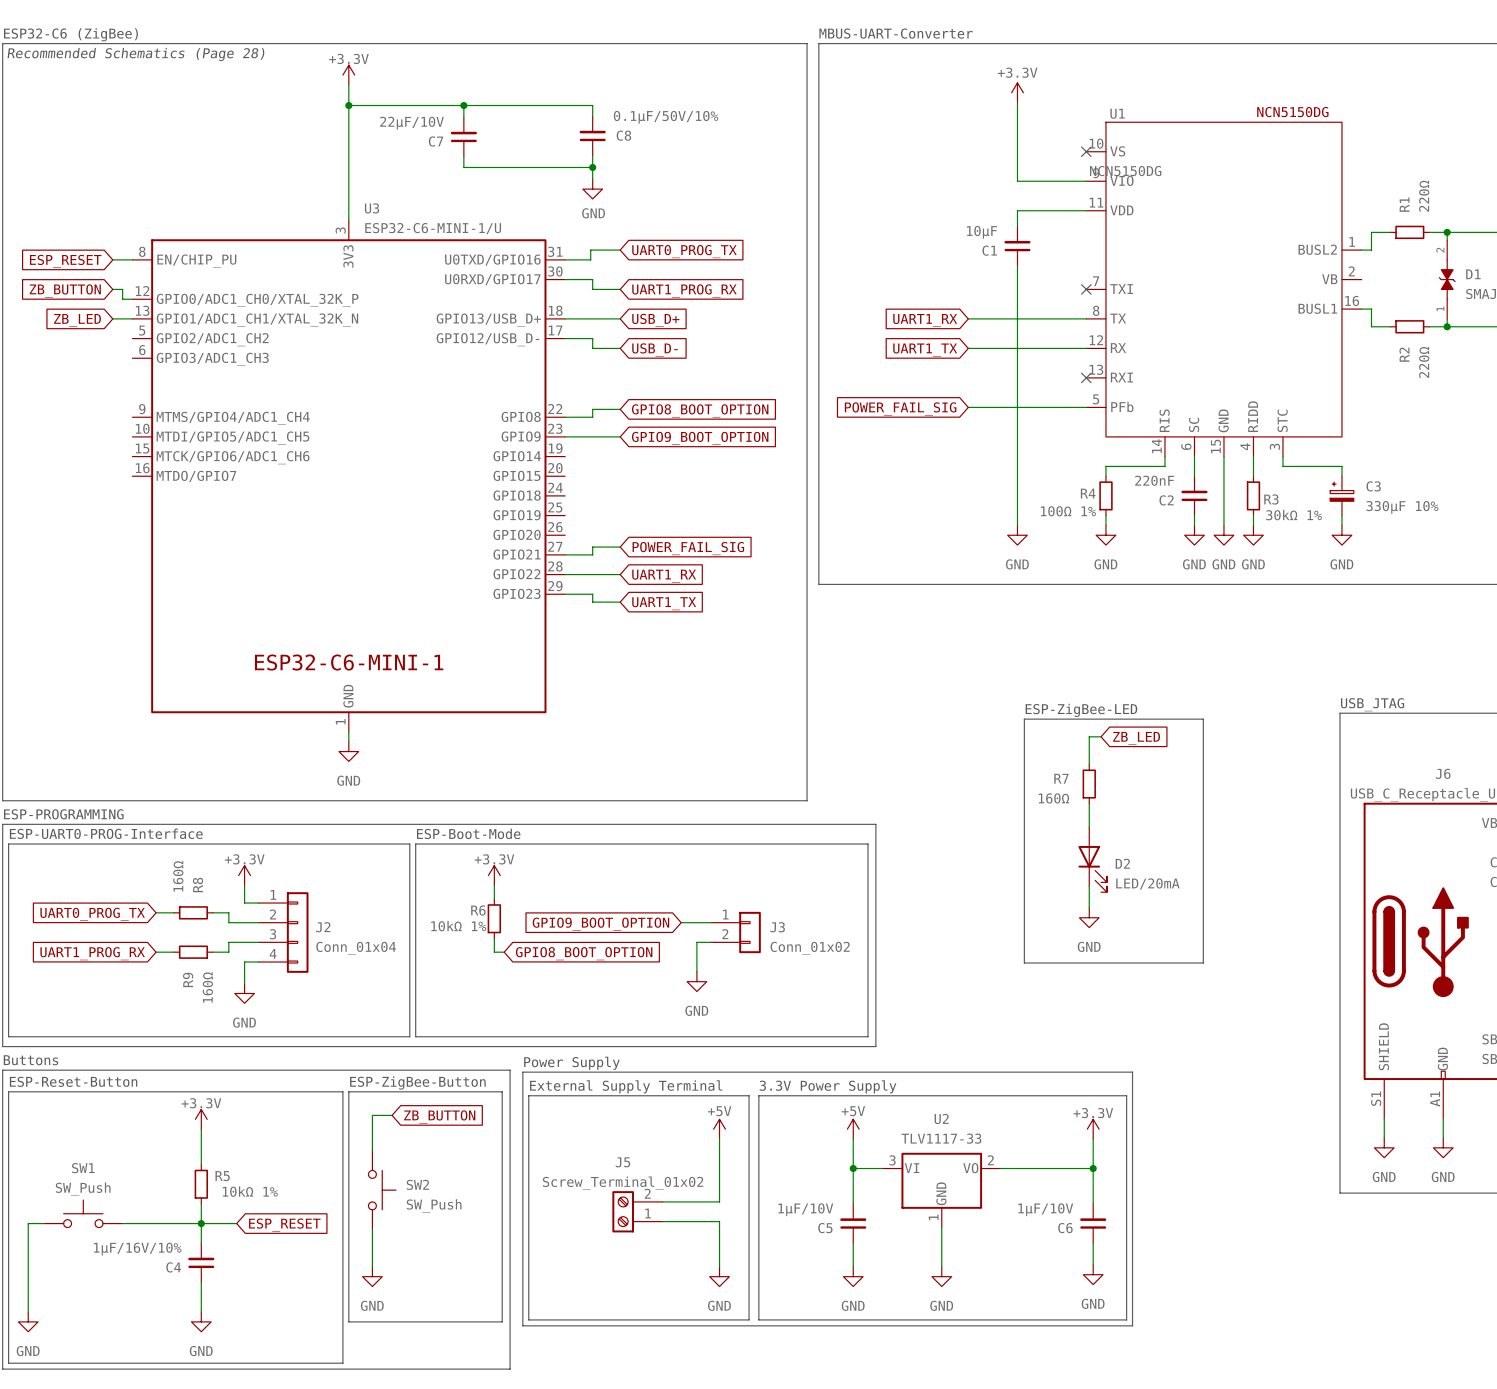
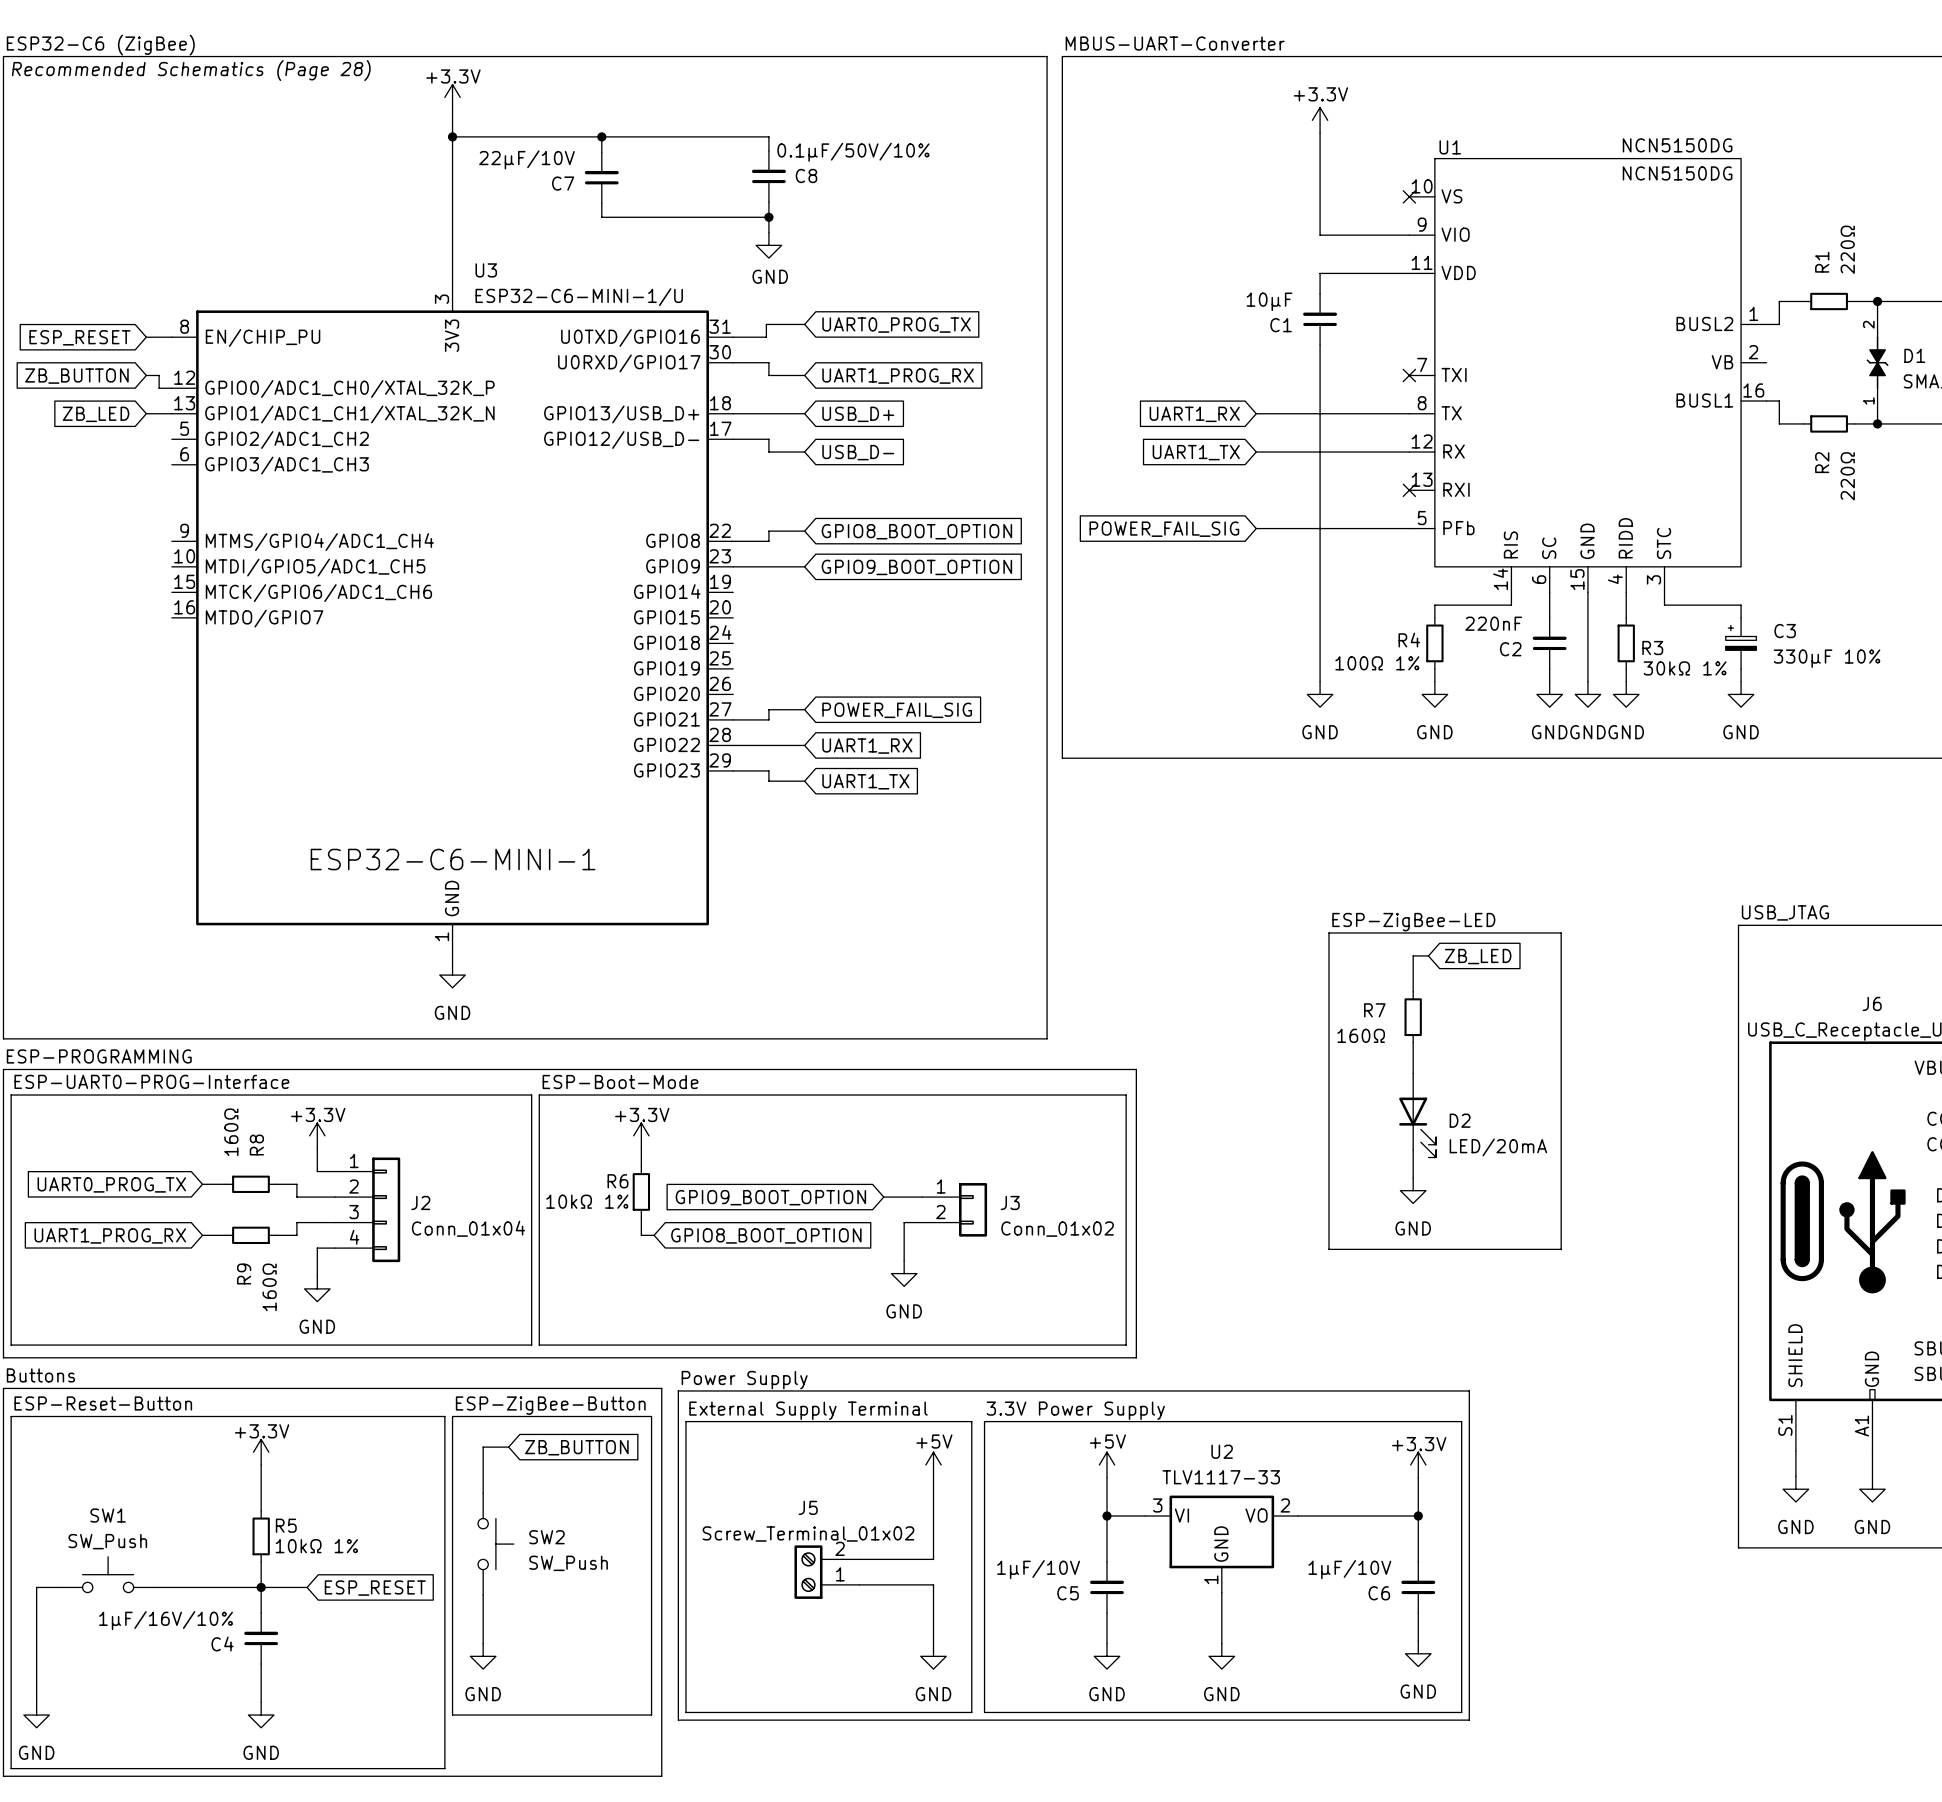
U1 value position: NCN5150DG (1125, 171) -> NCN5150DG (1677, 173)

